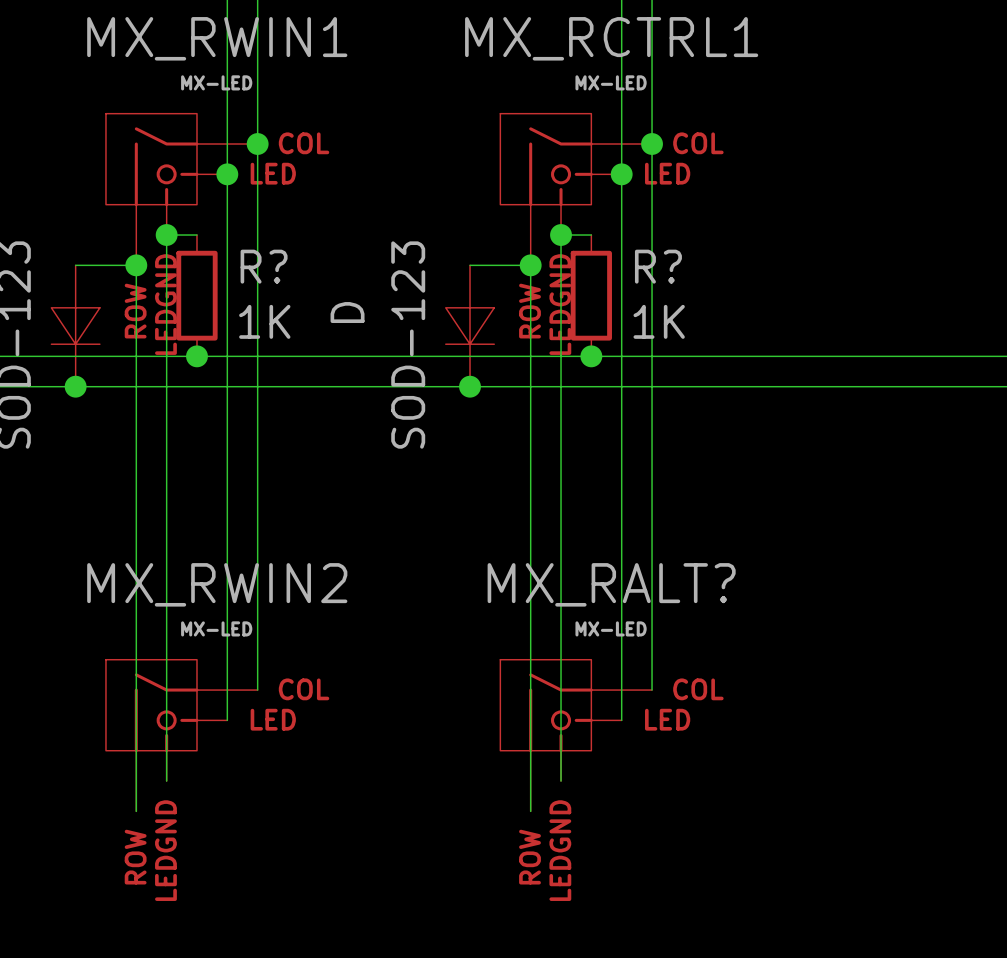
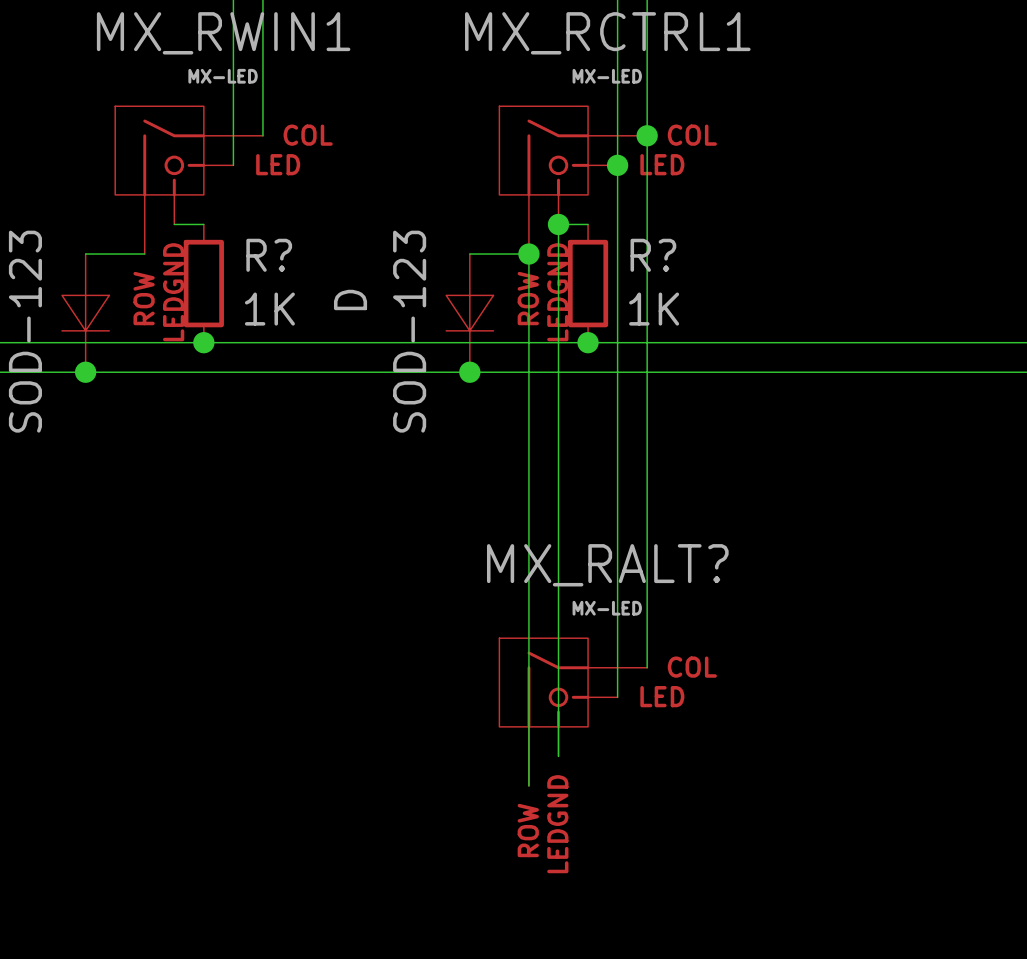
wire: (257, 144) (257, 690) -> none
junction: (257, 144) -> none
wire: (227, 174) (227, 720) -> none
junction: (227, 174) -> none
wire: (166, 235) (166, 781) -> none
junction: (166, 235) -> none
wire: (136, 265) (136, 811) -> none
junction: (136, 265) -> none
MX_RWIN2: MX-LED (181, 735) -> none

